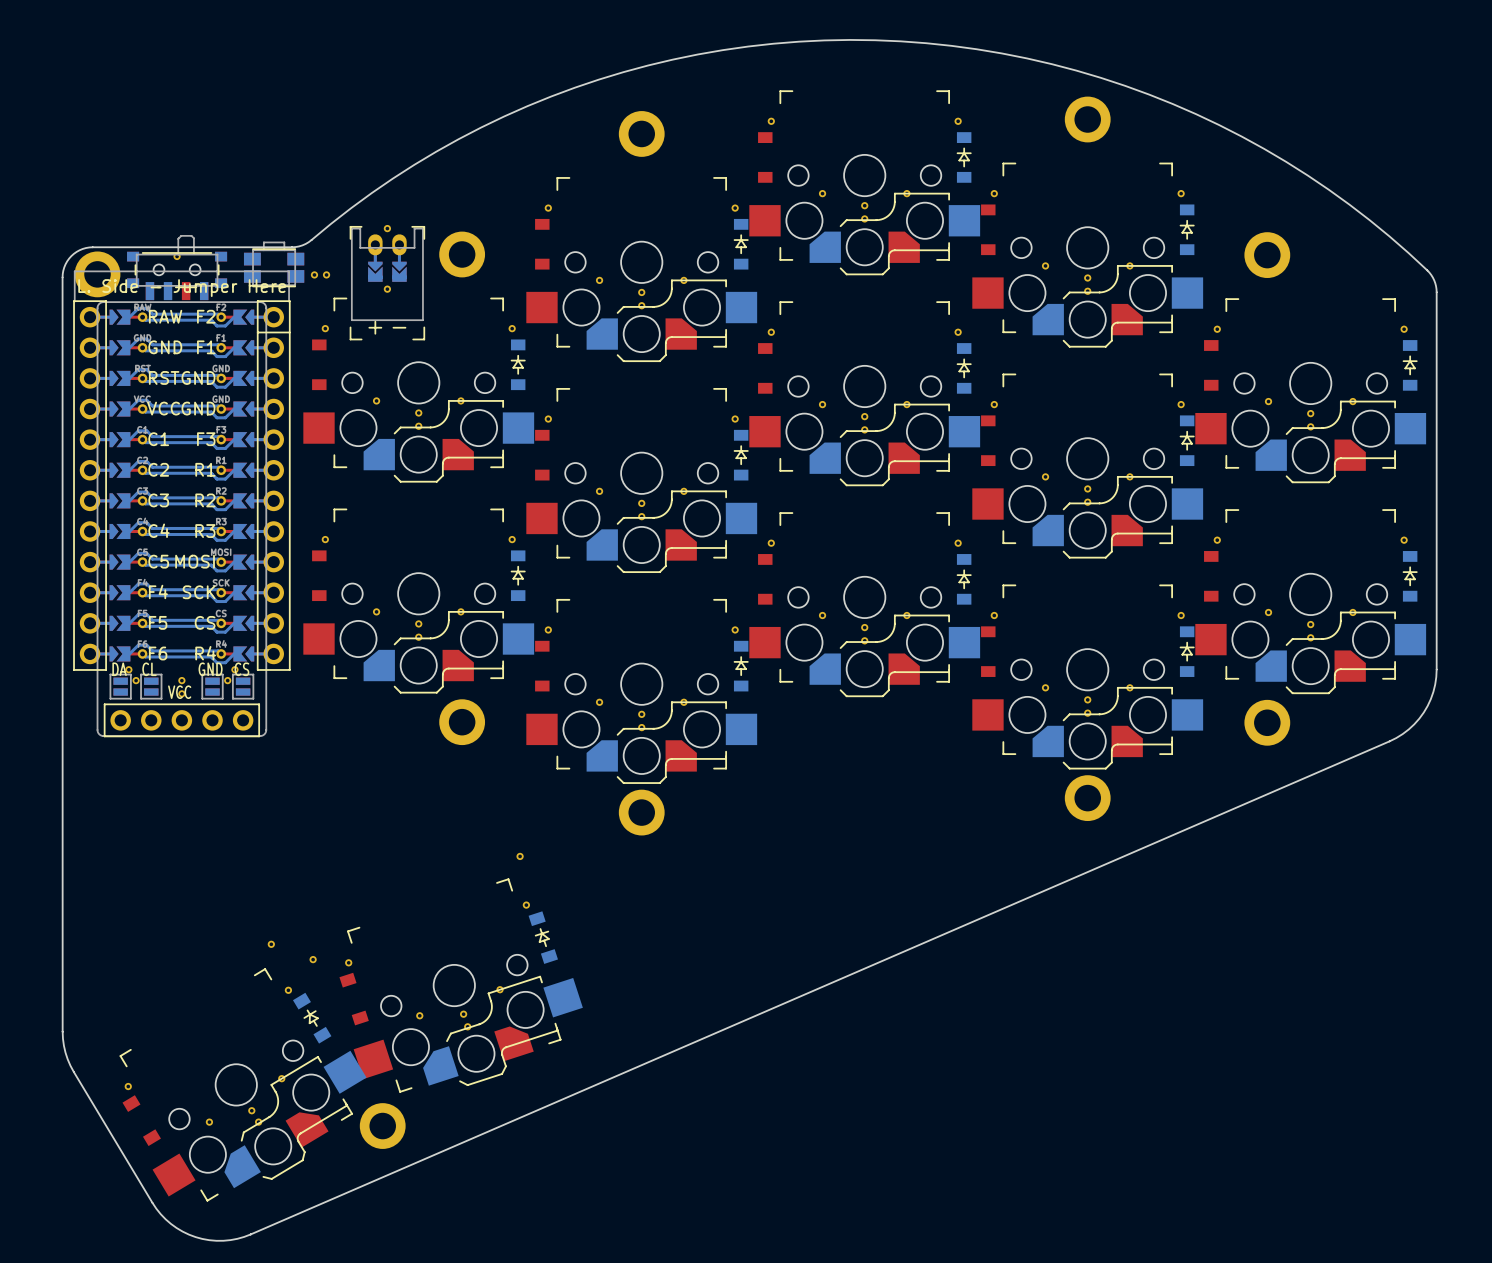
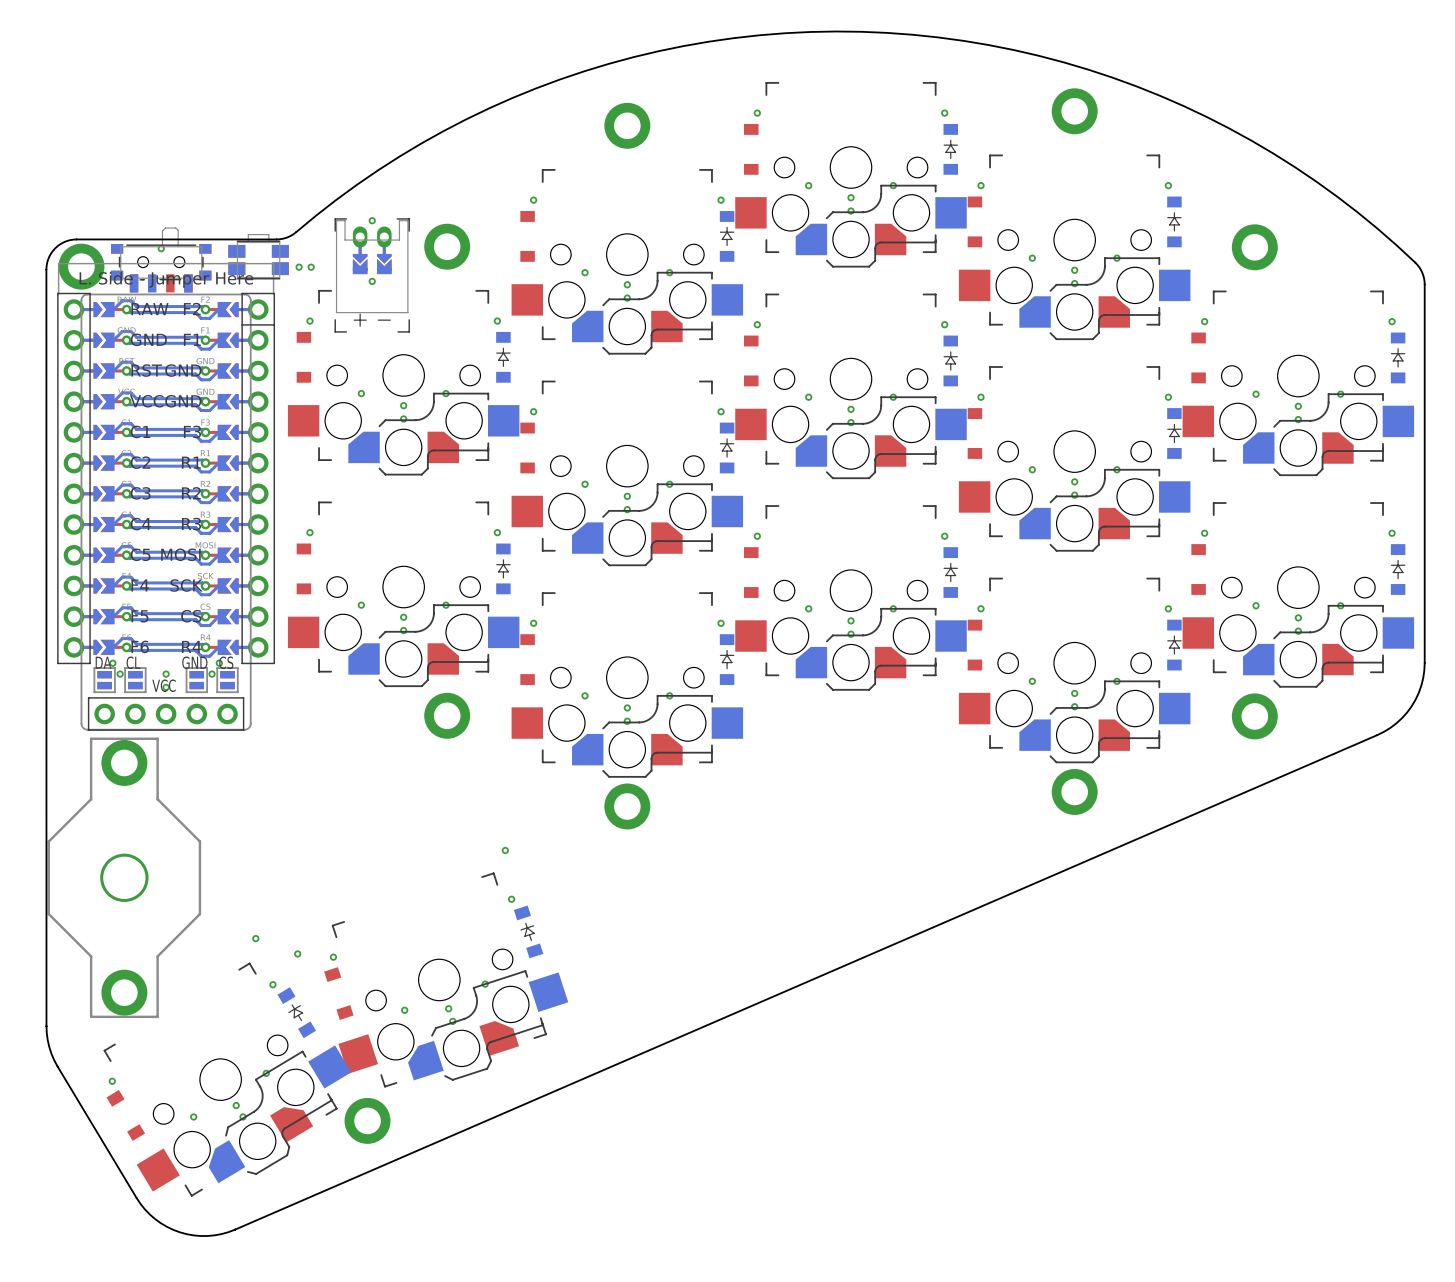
part: none -> (124, 877)

